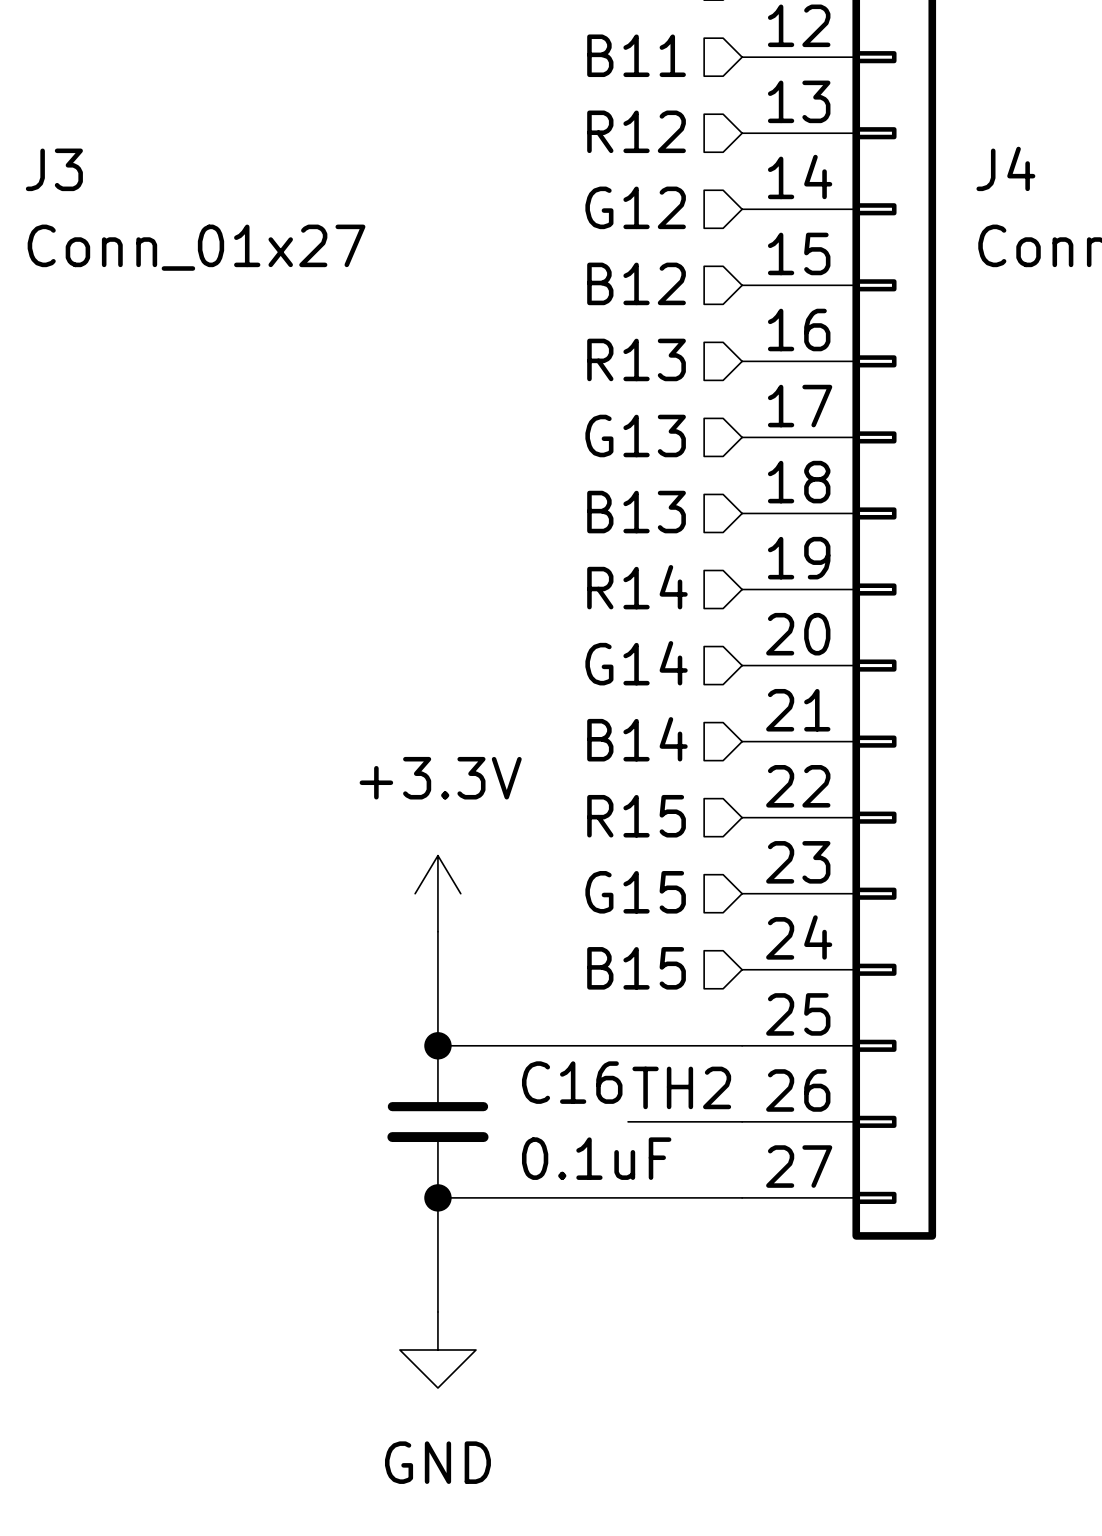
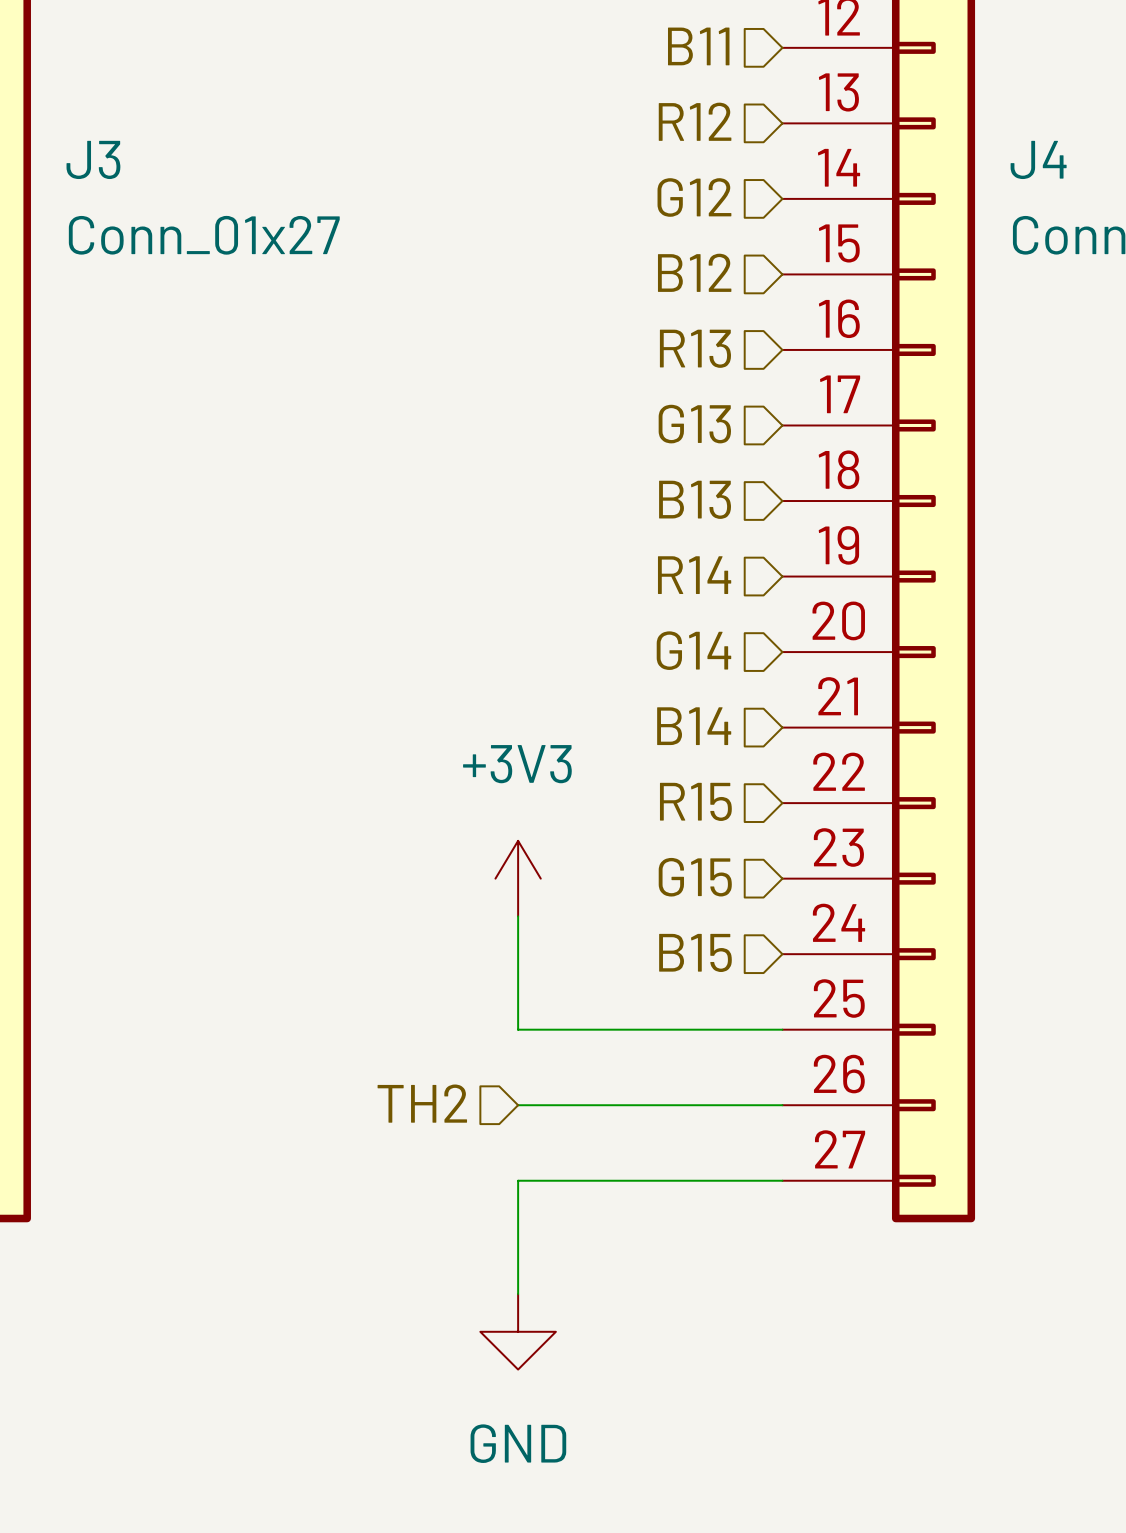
power symbol: +3.3V (437, 893) -> none
power symbol: none -> +3V3 (518, 878)
wire: (437, 931) (437, 1045) (475, 1045) -> (518, 916) (518, 1029)
junction: (437, 1045) -> none
label: TH2 (681, 1087) -> none
hierarchical label: none -> TH2 (422, 1103)
C16: 0.1uF (437, 1121) -> none
wire: none -> (518, 1105) (669, 1105)
junction: (437, 1197) -> none
wire: (475, 1197) (437, 1197) (437, 1311) -> (518, 1180) (518, 1294)
power symbol position: GND (437, 1349) -> GND (518, 1331)

